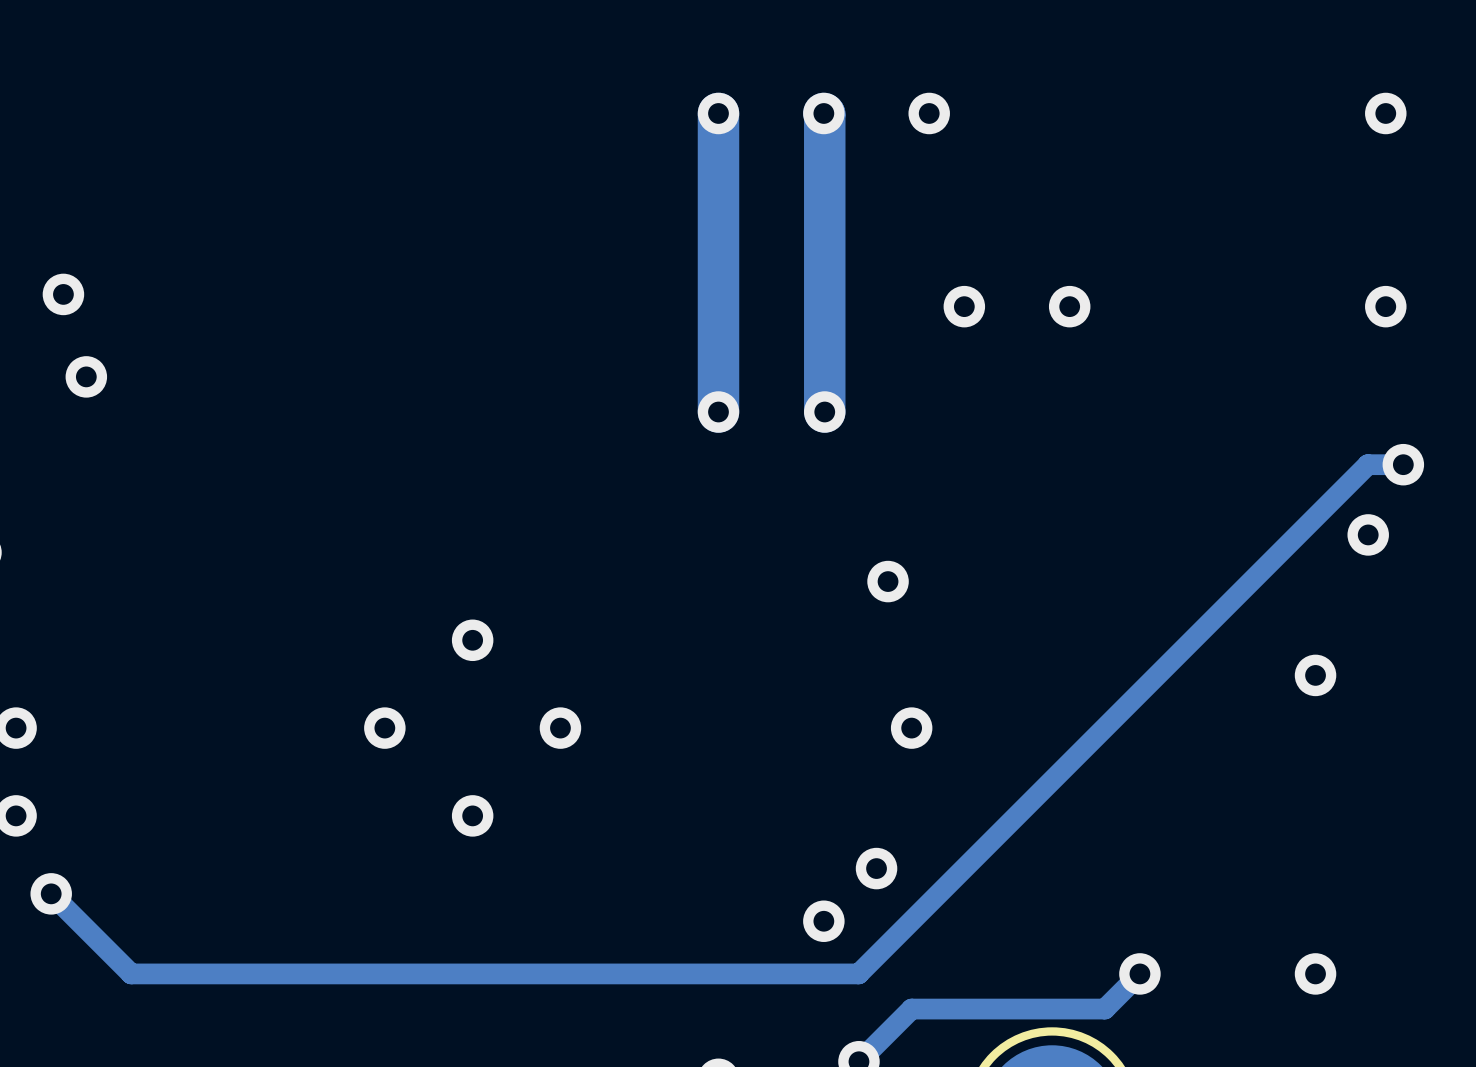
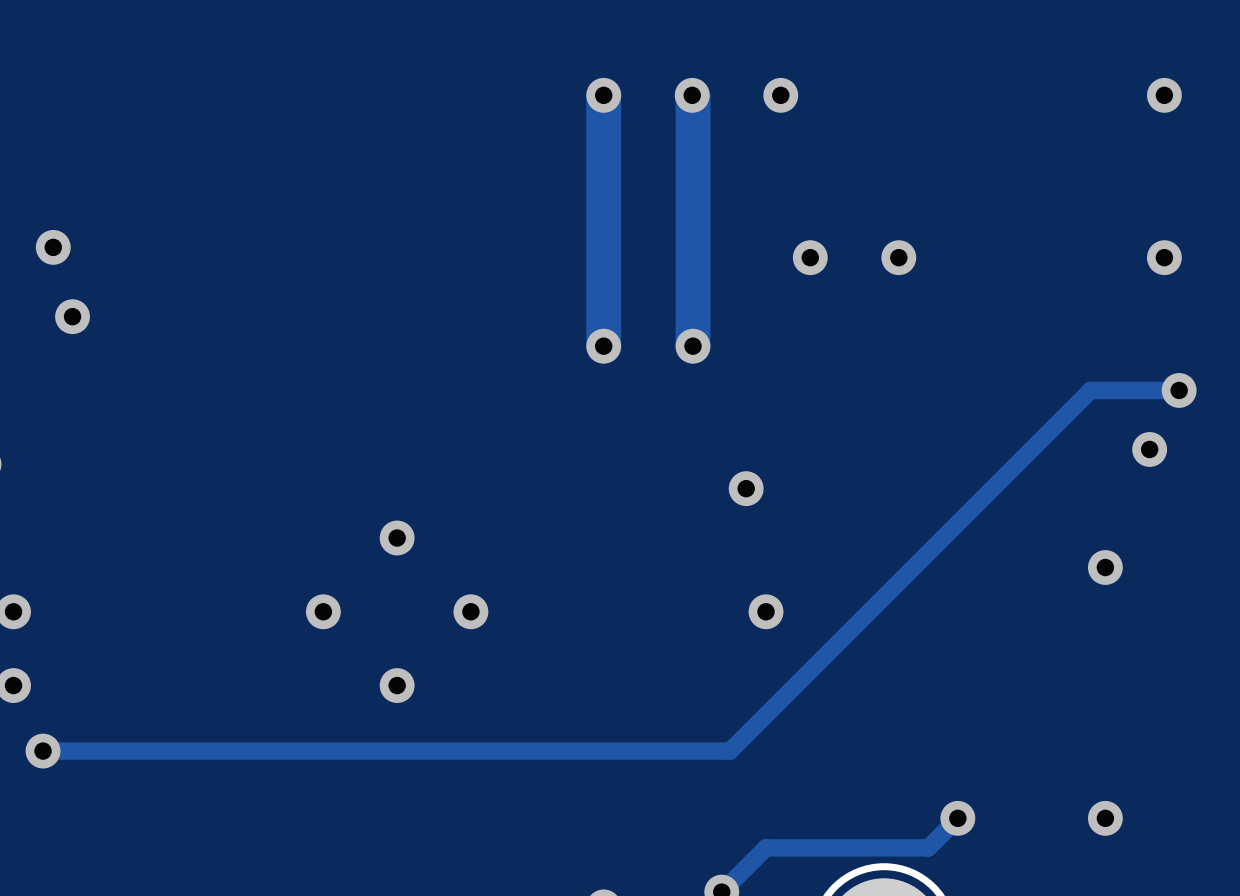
track: (1367, 464) (858, 973) (131, 973) (51, 893) -> (1149, 390) (1090, 390) (730, 751) (43, 751)
via: (876, 868) -> none
via: (823, 921) -> none

